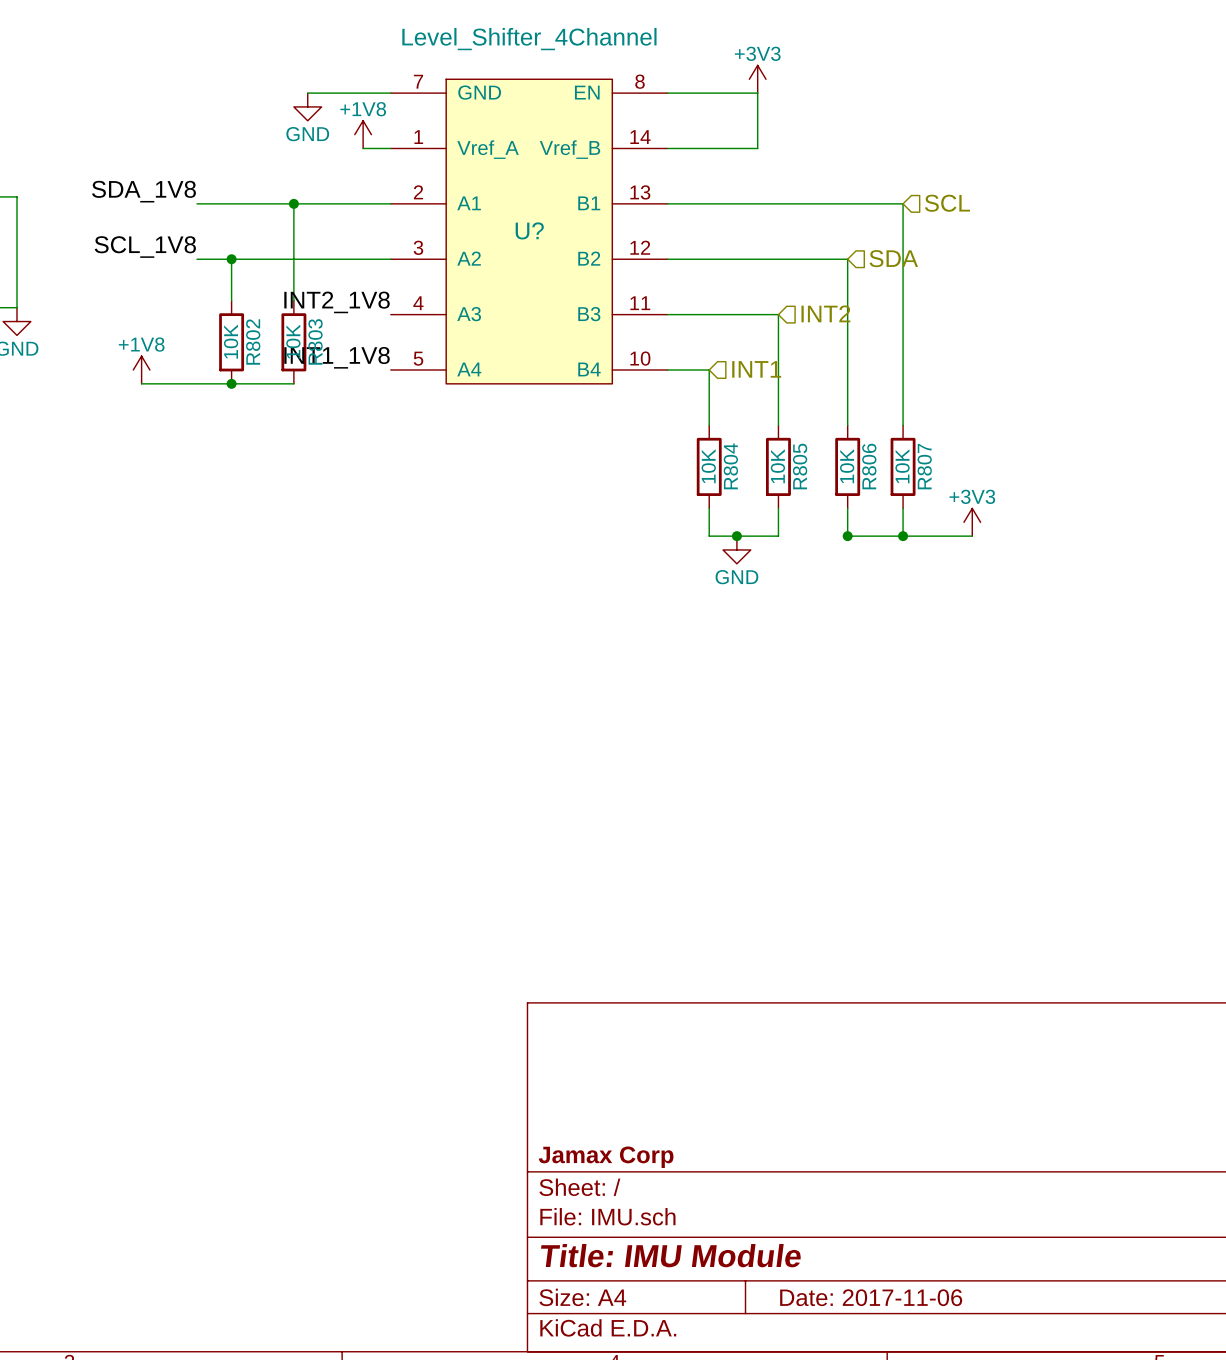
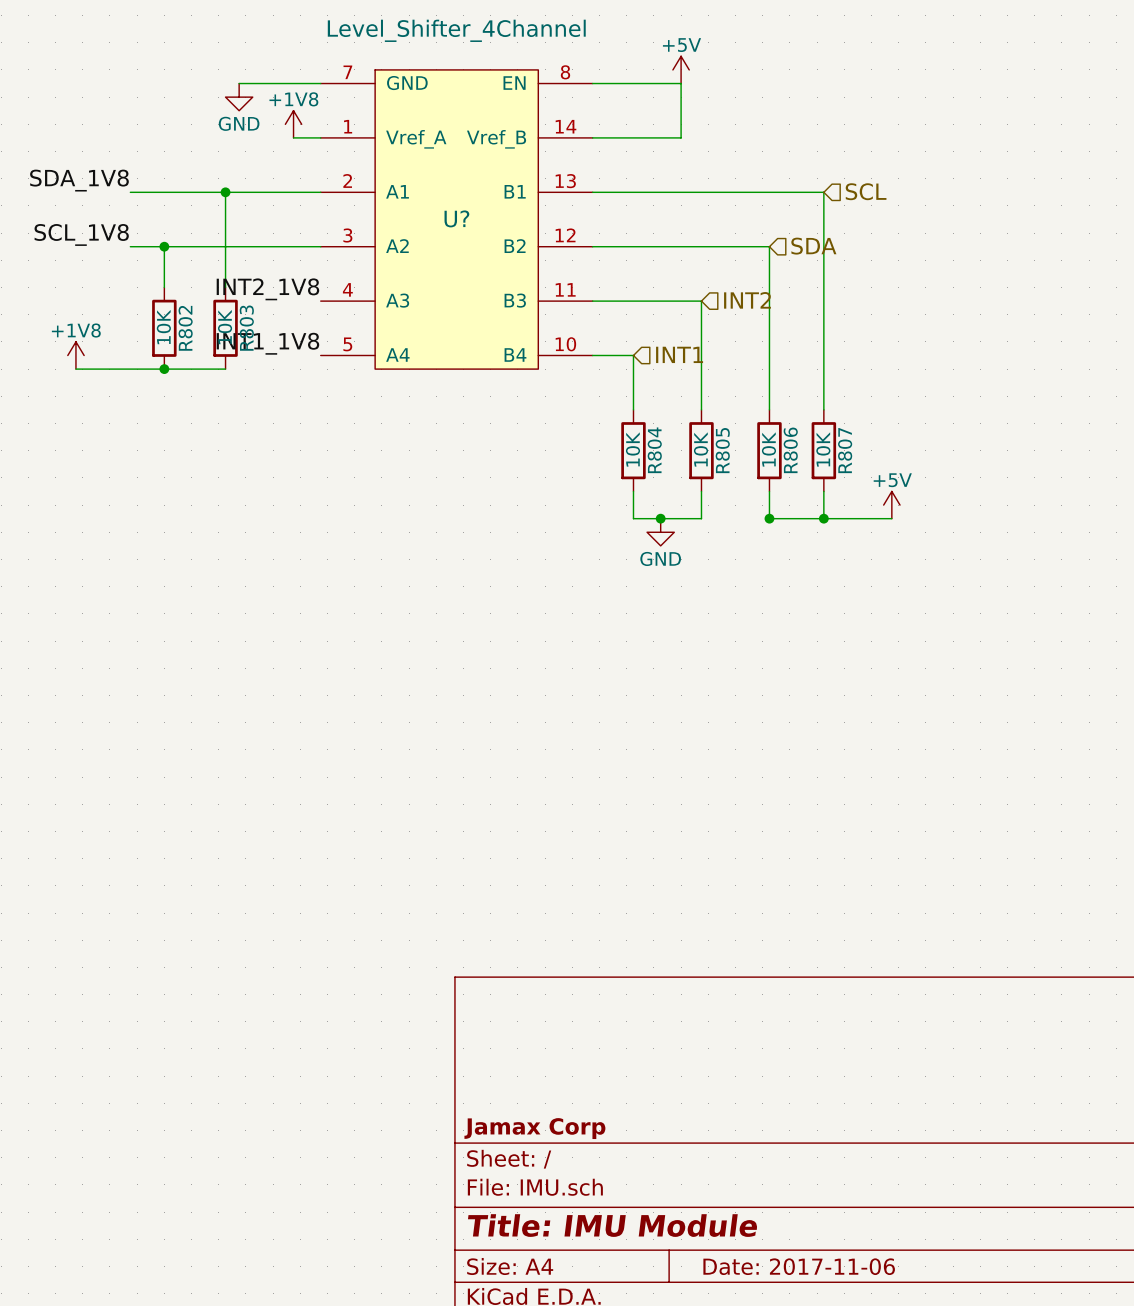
power symbol: +3V3 (757, 79) -> +5V (681, 69)
power symbol: +3V3 (972, 522) -> +5V (891, 505)

